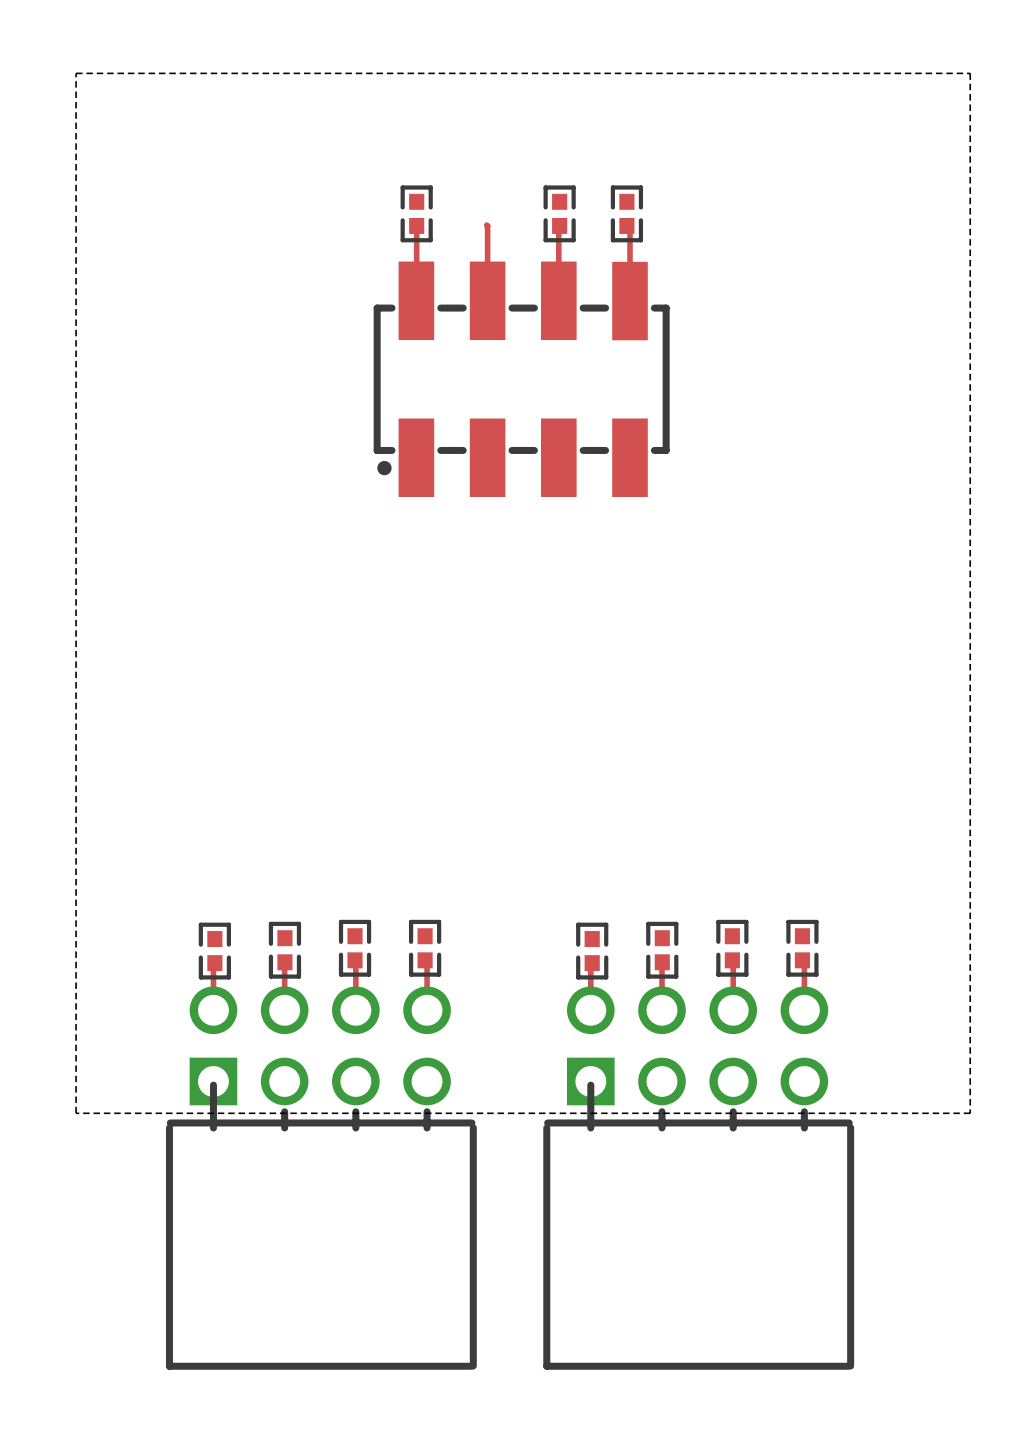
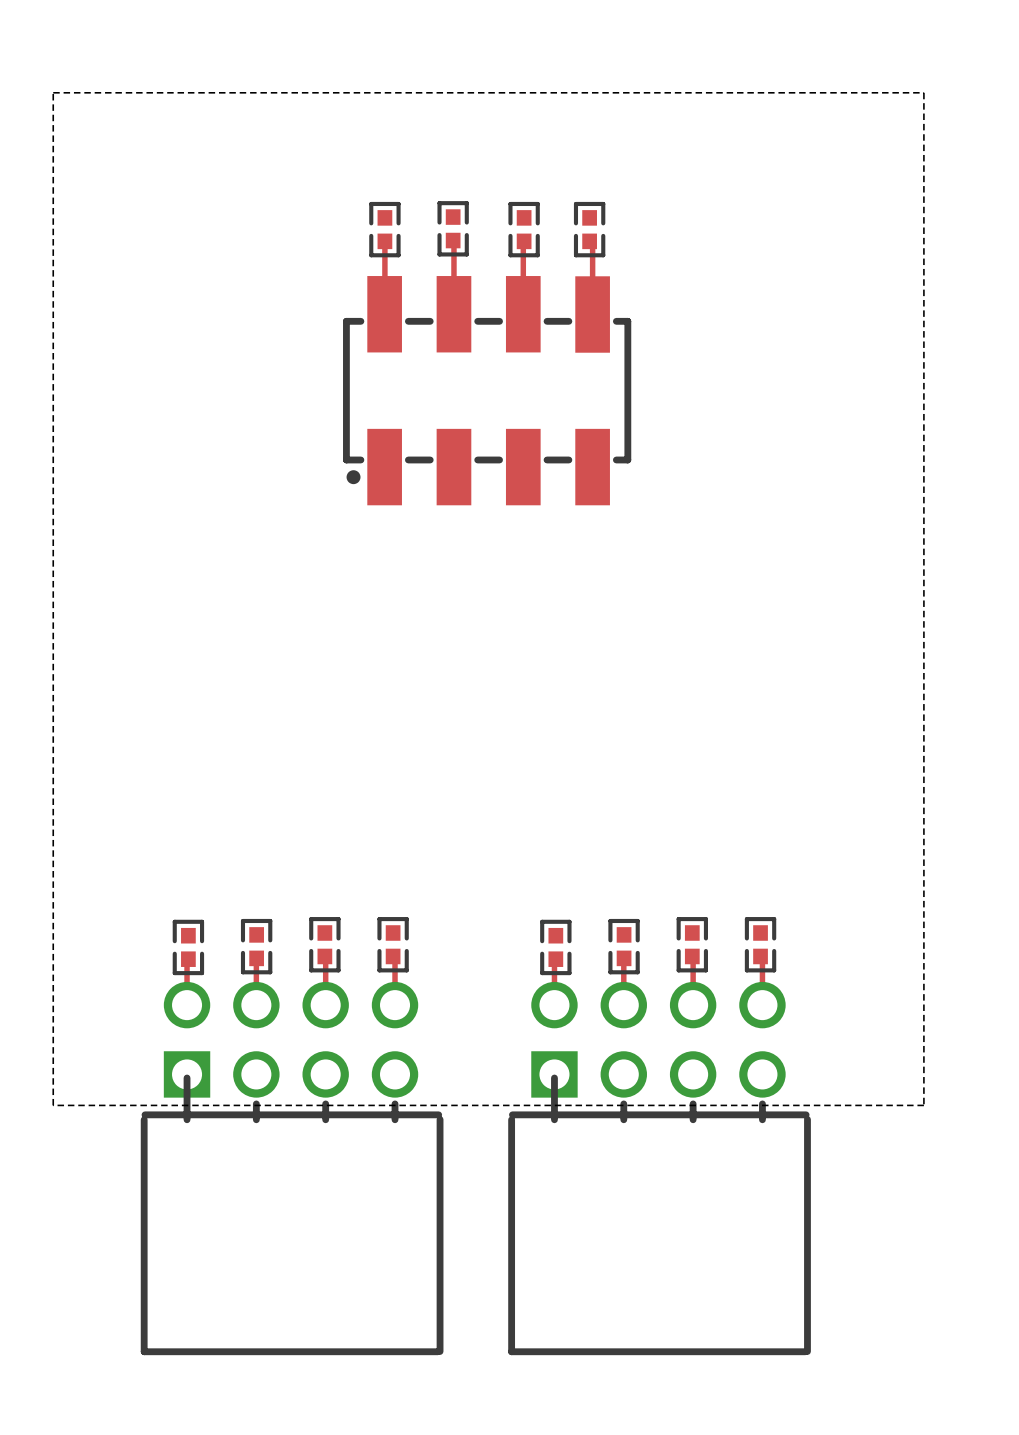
part: none -> (453, 228)

